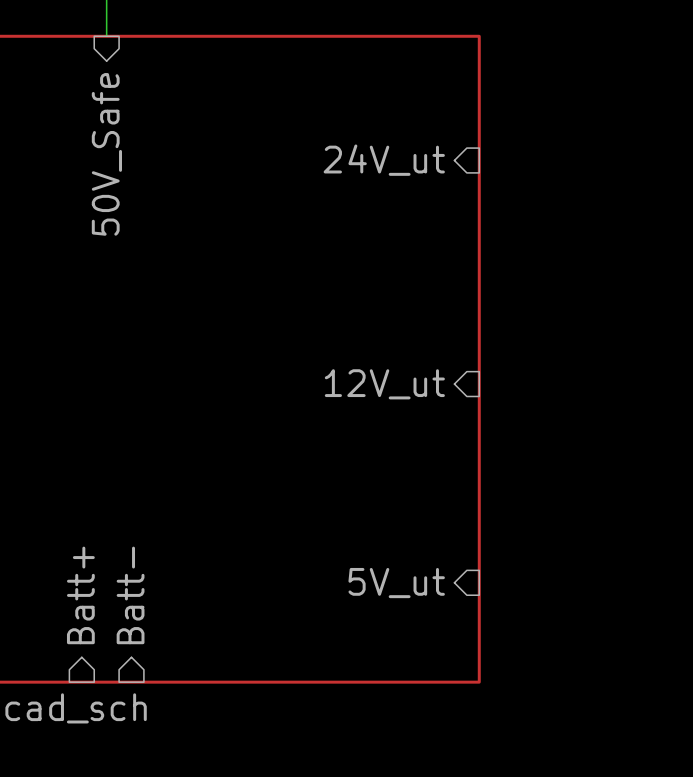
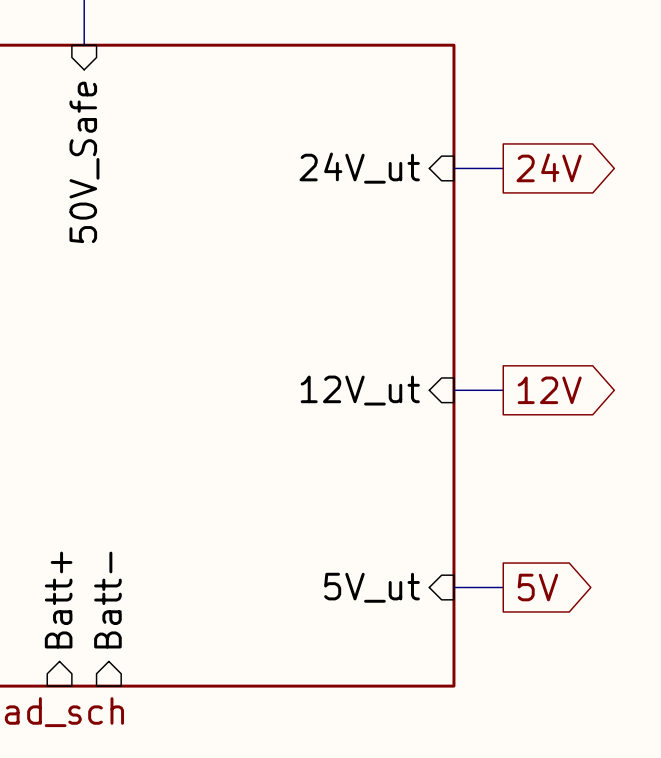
global label: none -> 24V (549, 167)
wire: none -> (453, 168) (503, 168)
wire: none -> (453, 390) (503, 390)
global label: none -> 12V (549, 390)
wire: none -> (453, 587) (503, 587)
global label: none -> 5V (537, 587)

